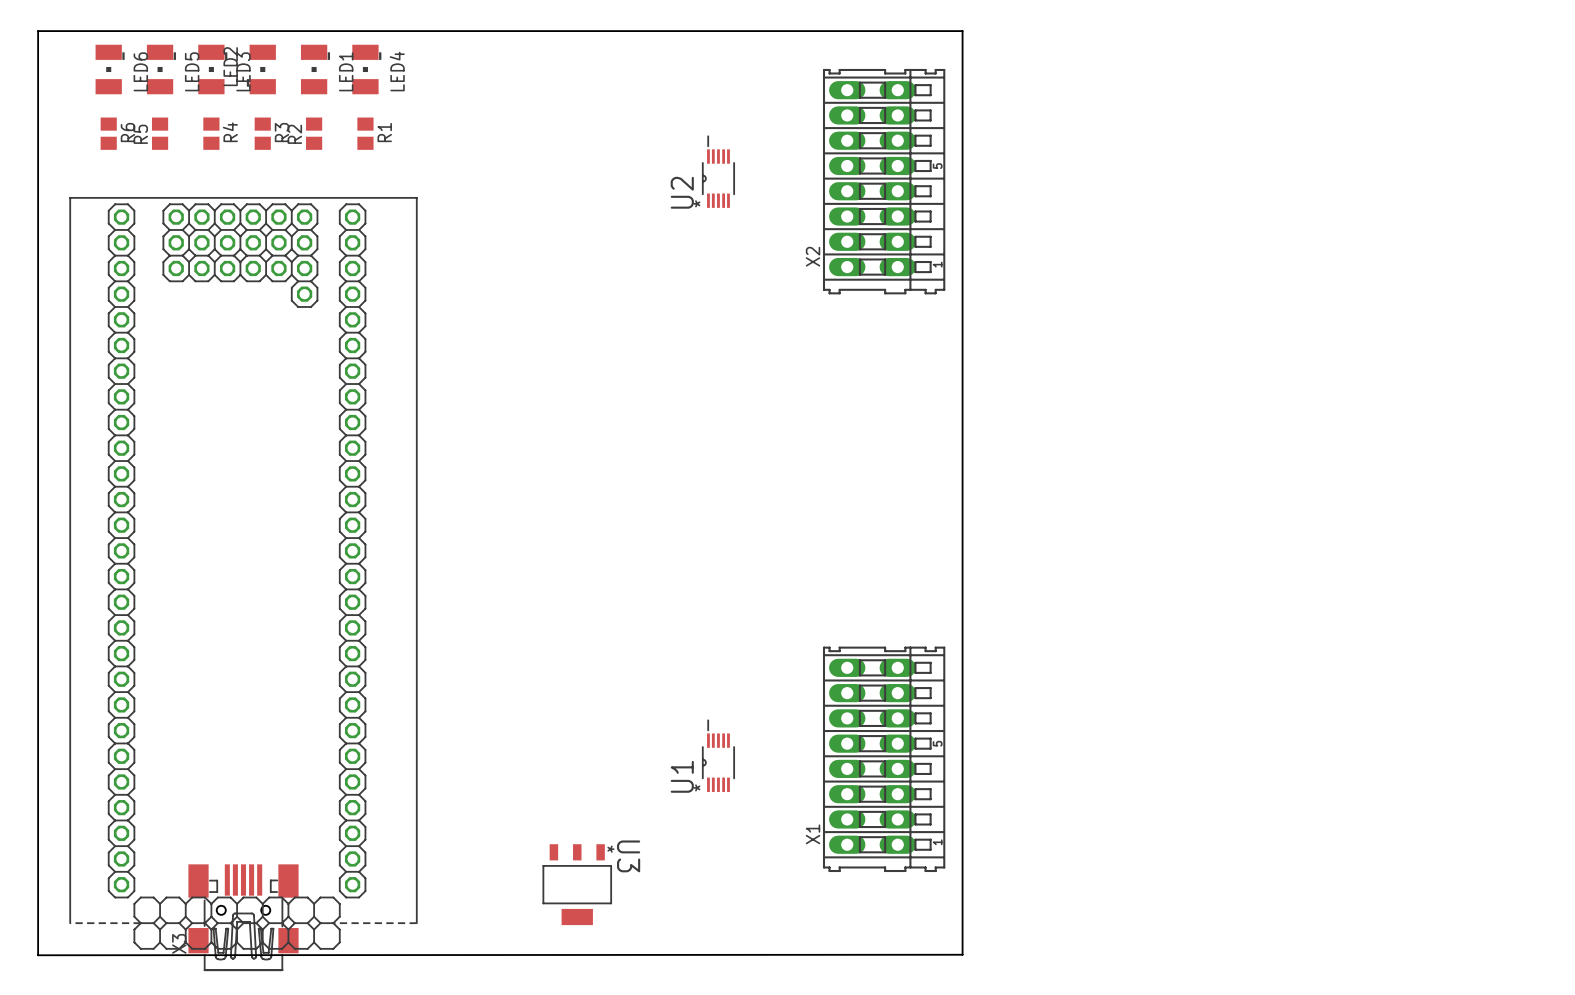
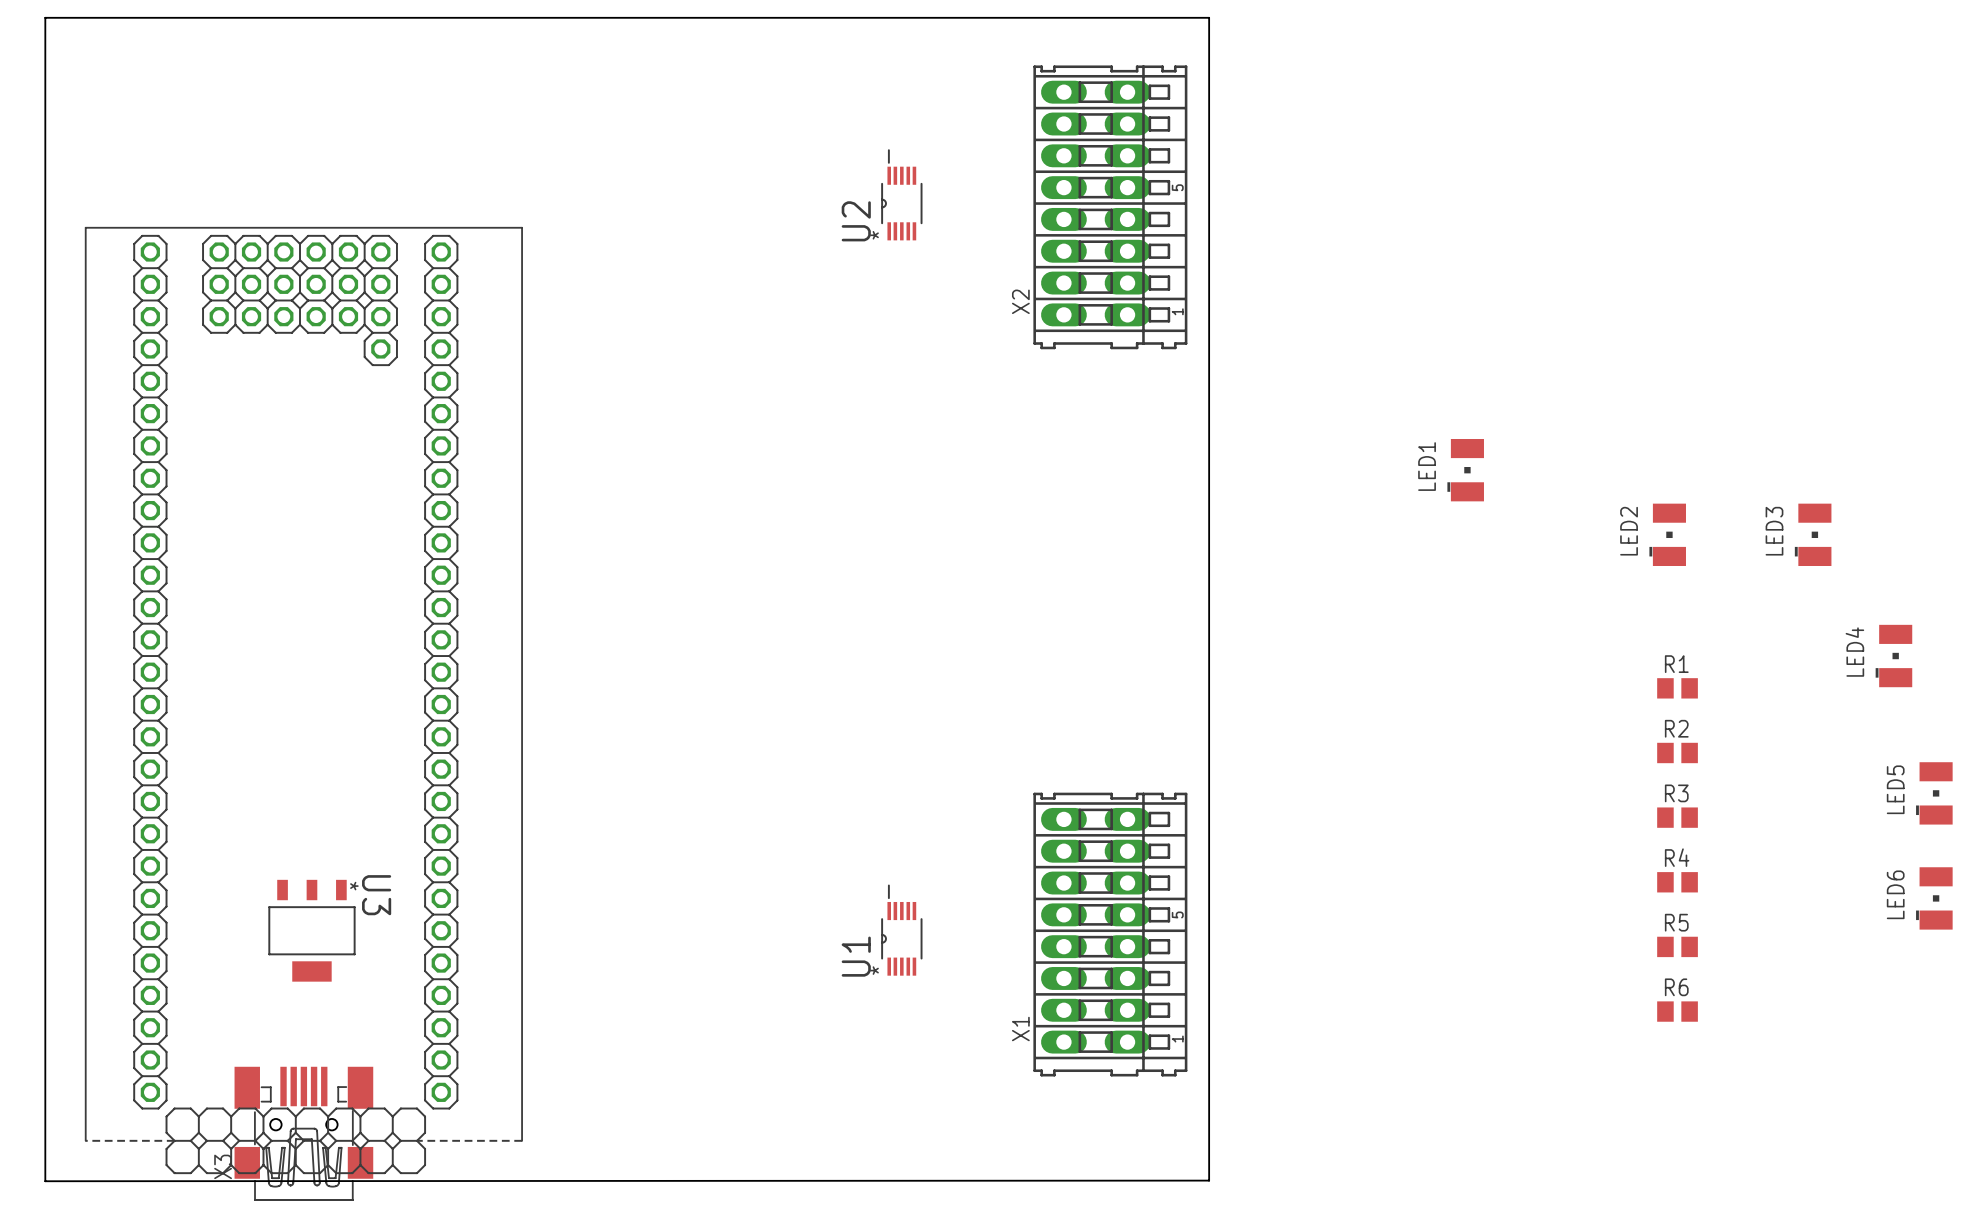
LED6 rotation: 0° (110, 69) -> 180° (1934, 898)
LED6 position: (110, 69) -> (1934, 898)
LED5 rotation: 0° (161, 69) -> 180° (1934, 793)
LED5 position: (161, 69) -> (1934, 793)
LED3 rotation: 0° (212, 69) -> 180° (1813, 534)
LED3 position: (212, 69) -> (1813, 534)
LED2 position: (261, 69) -> (1667, 534)
LED1 rotation: 0° (315, 69) -> 180° (1465, 470)
LED1 position: (315, 69) -> (1465, 470)
LED4 rotation: 0° (366, 69) -> 180° (1893, 656)
LED4 position: (366, 69) -> (1893, 656)
R6 name position: R6 (127, 132) -> R6 (1676, 987)
R4 name position: R4 (230, 132) -> R4 (1677, 857)
R3 name position: R3 (282, 132) -> R3 (1676, 793)
R1 name position: R1 (384, 132) -> R1 (1676, 664)
R6 rotation: 0° (108, 133) -> 90° clockwise (1677, 1011)
R6 position: (108, 133) -> (1677, 1011)
R5 rotation: 0° (160, 133) -> 90° clockwise (1677, 946)
R5 position: (160, 133) -> (1677, 946)
R4 rotation: 0° (211, 133) -> 90° clockwise (1677, 882)
R4 position: (211, 133) -> (1677, 882)
R3 rotation: 0° (262, 133) -> 90° clockwise (1677, 817)
R3 position: (262, 133) -> (1677, 817)
R2 rotation: 0° (314, 133) -> 90° clockwise (1677, 752)
R2 position: (314, 133) -> (1677, 752)
R1 rotation: 0° (365, 133) -> 90° clockwise (1677, 688)
R1 position: (365, 133) -> (1677, 688)
U3 position: (577, 884) -> (311, 930)

